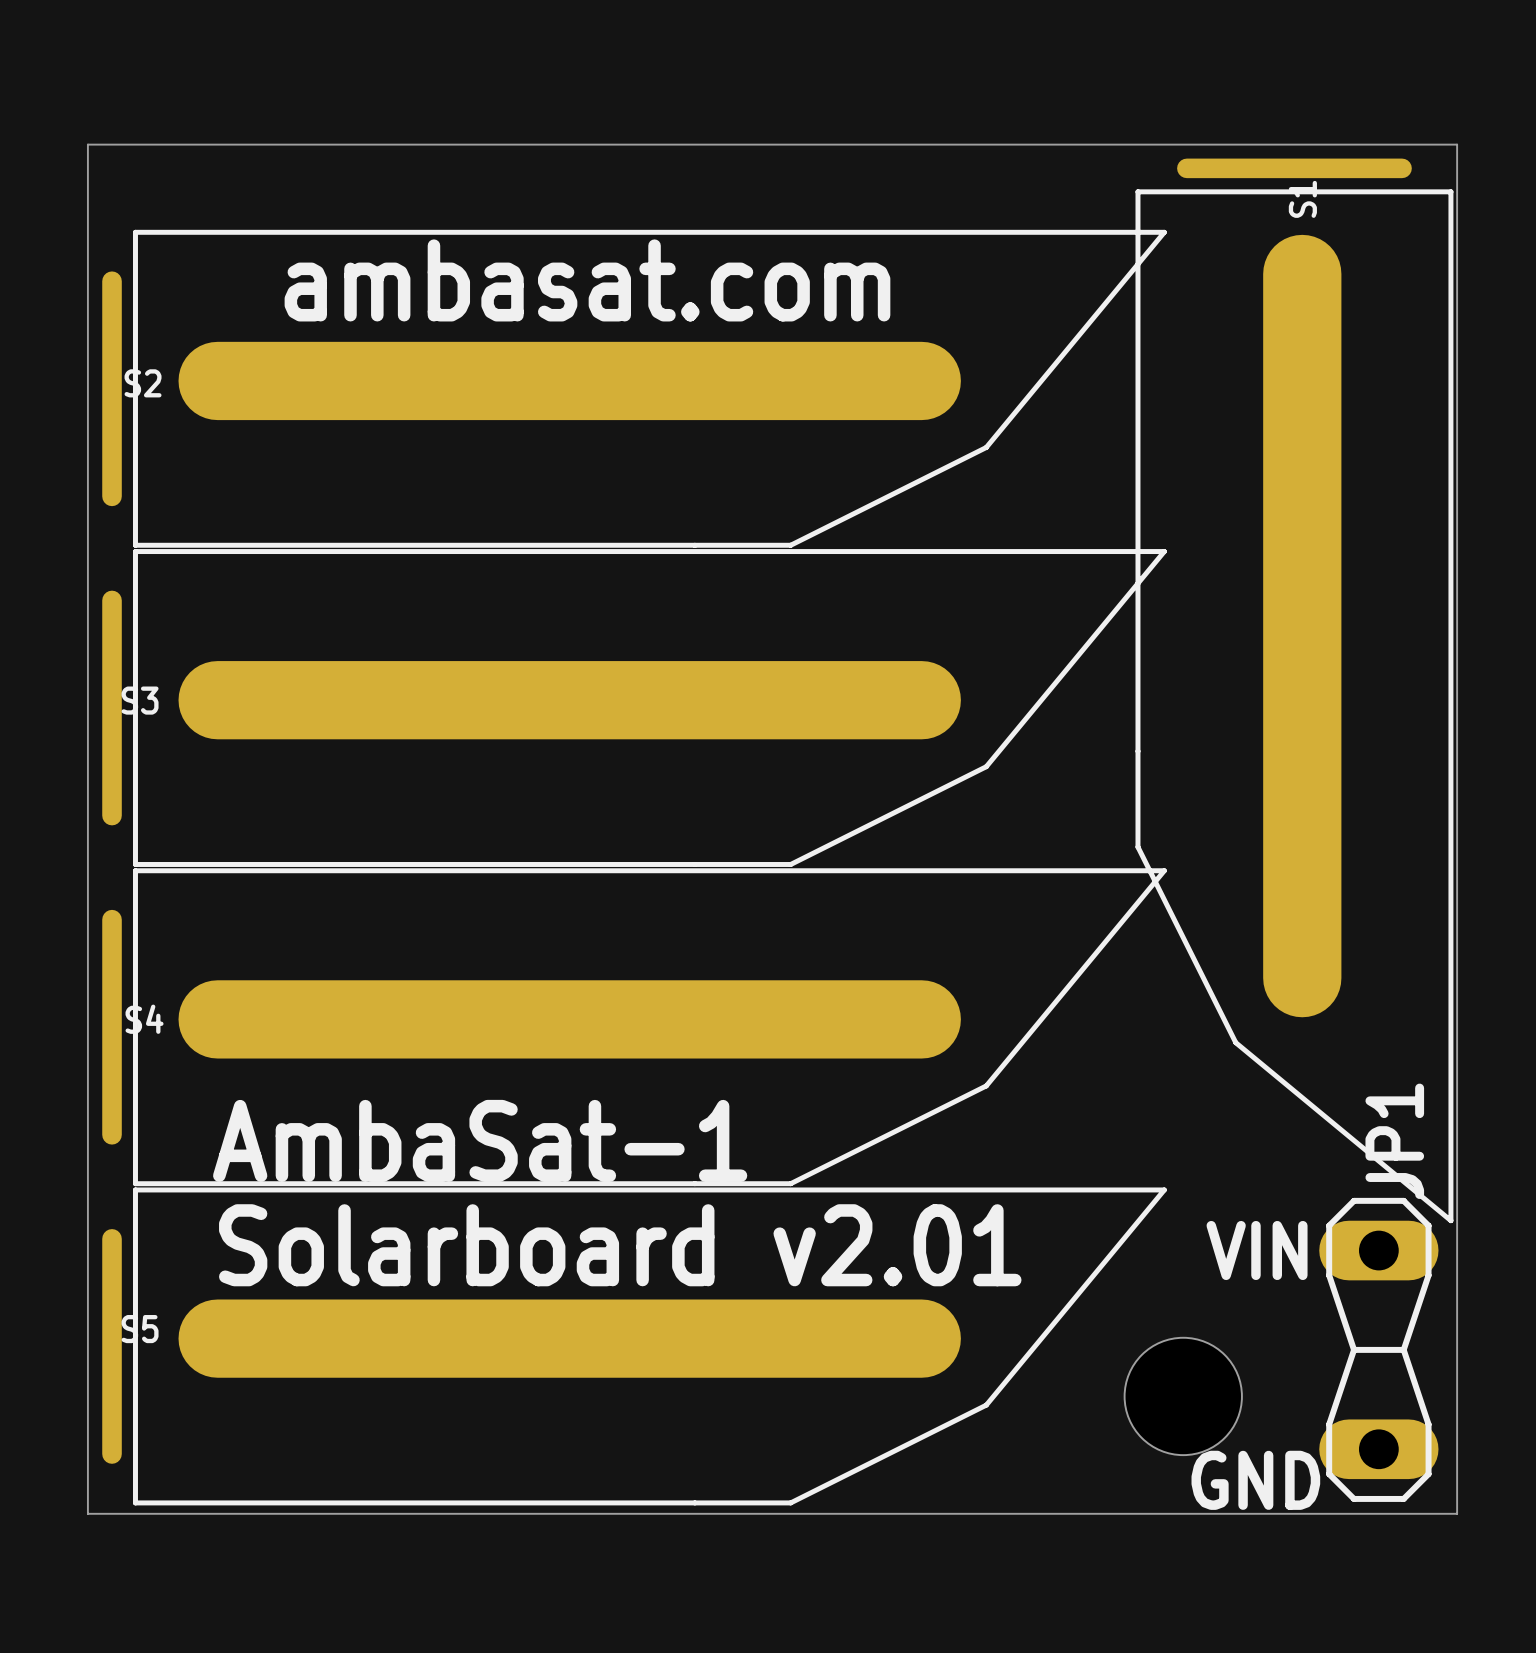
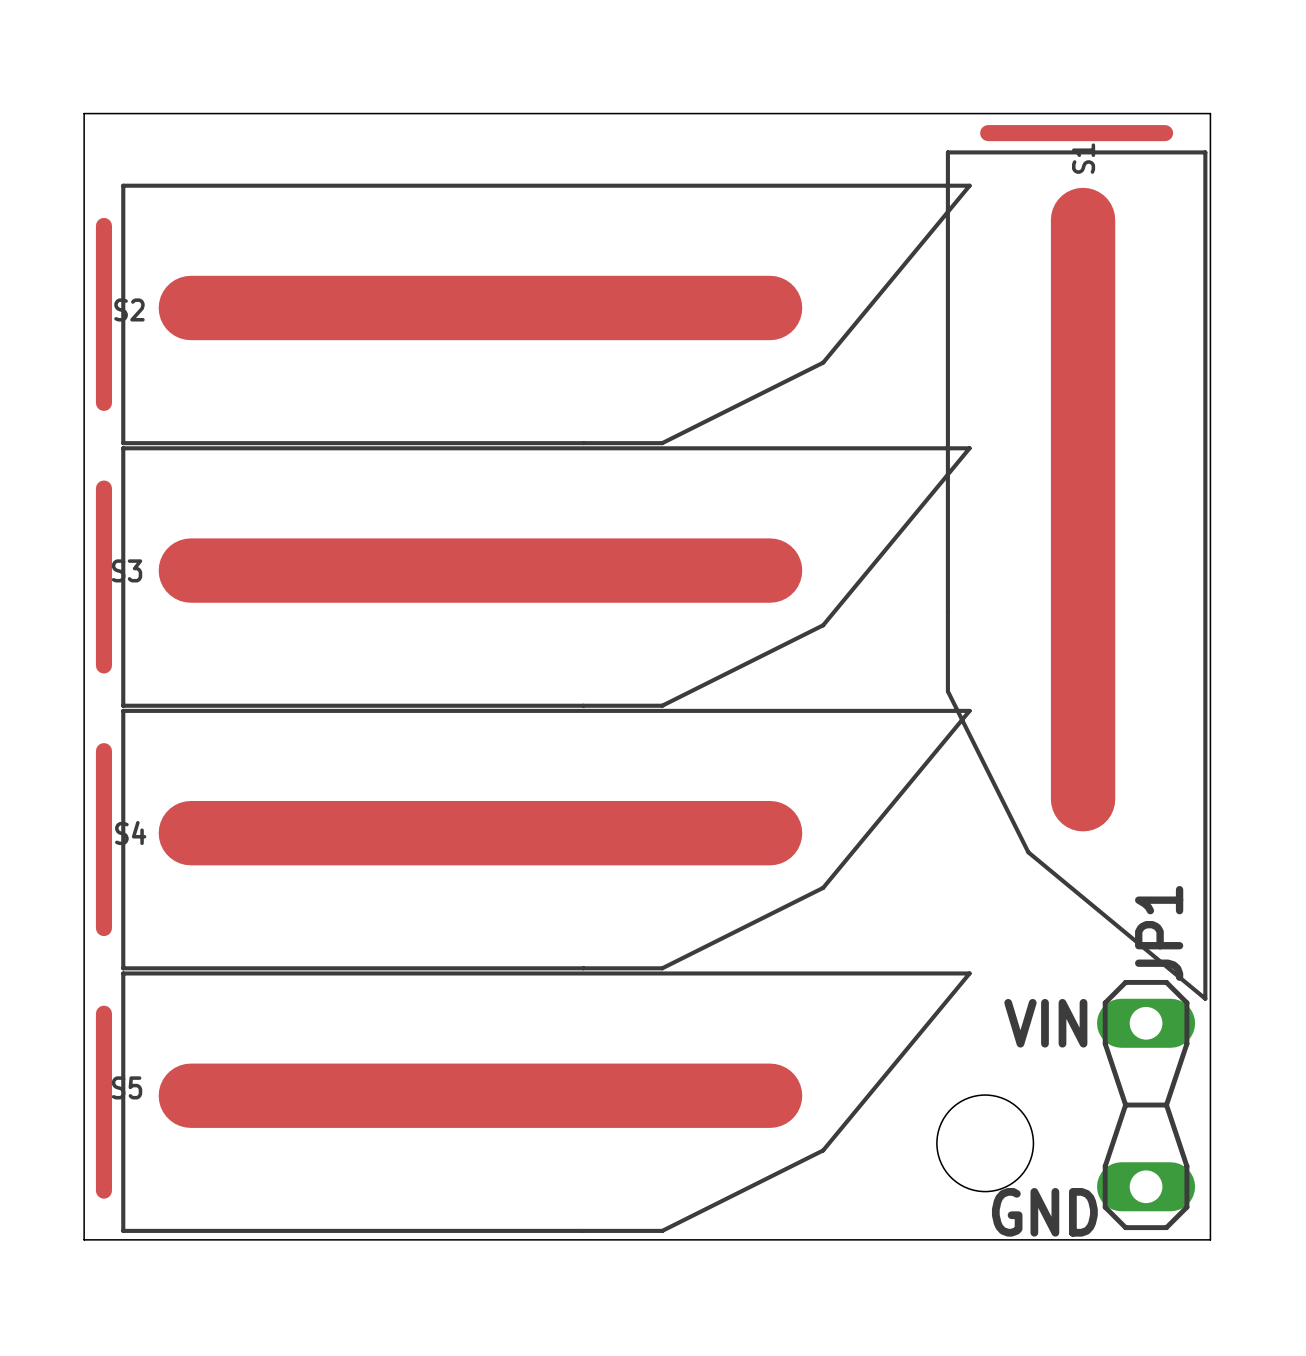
text: ambasat.com (587, 280) -> none
text: AmbaSat-1 (480, 1140) -> none
text: Solarboard v2.01 (620, 1245) -> none

